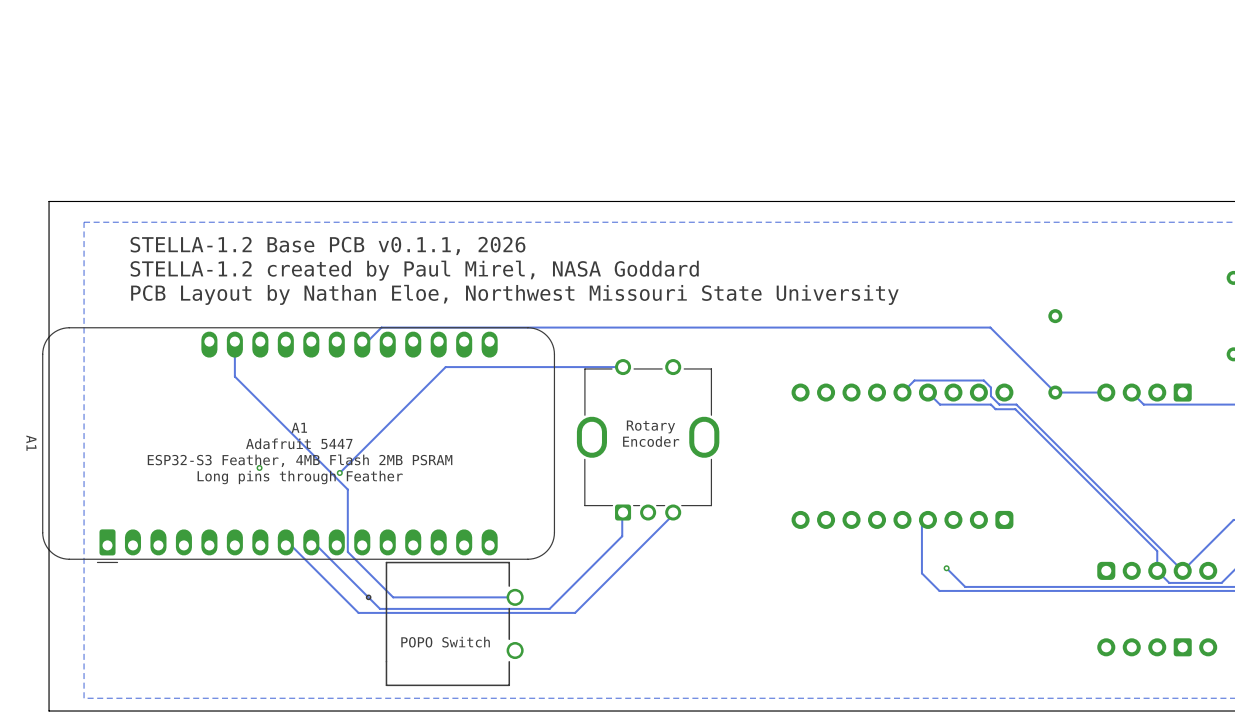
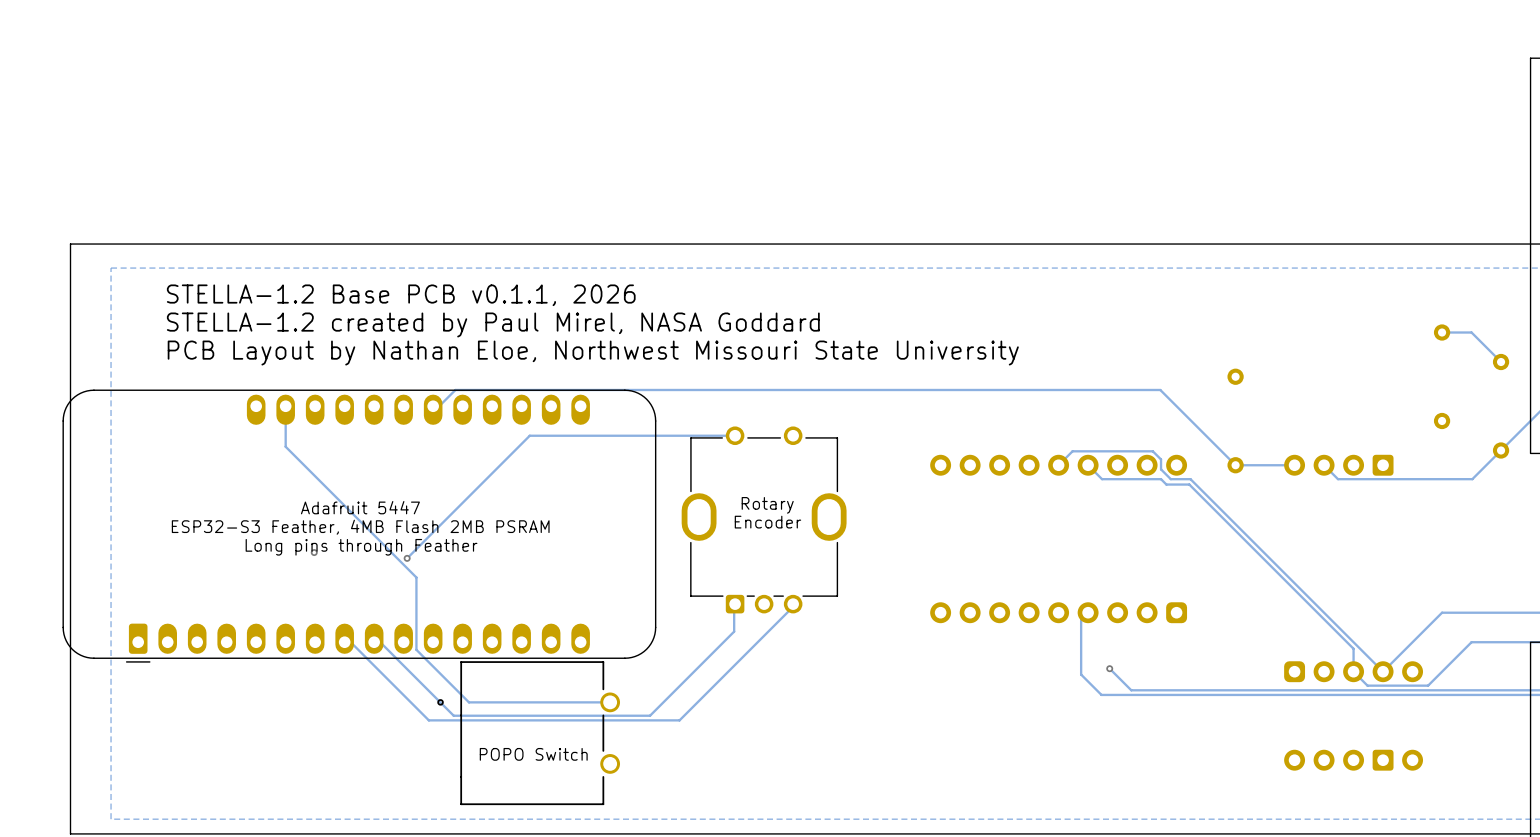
text: A1 (299, 427) -> Adafruit 5447 (360, 507)
A1 name: A1 (31, 443) -> none
text: Adafruit 5447 (299, 443) -> ESP32-S3 Feather, 4MB Flash 2MB PSRAM (360, 527)
text: ESP32-S3 Feather, 4MB Flash 2MB PSRAM (300, 460) -> Long pins through Feather (361, 547)
text: Long pins through Feather (300, 477) -> none

